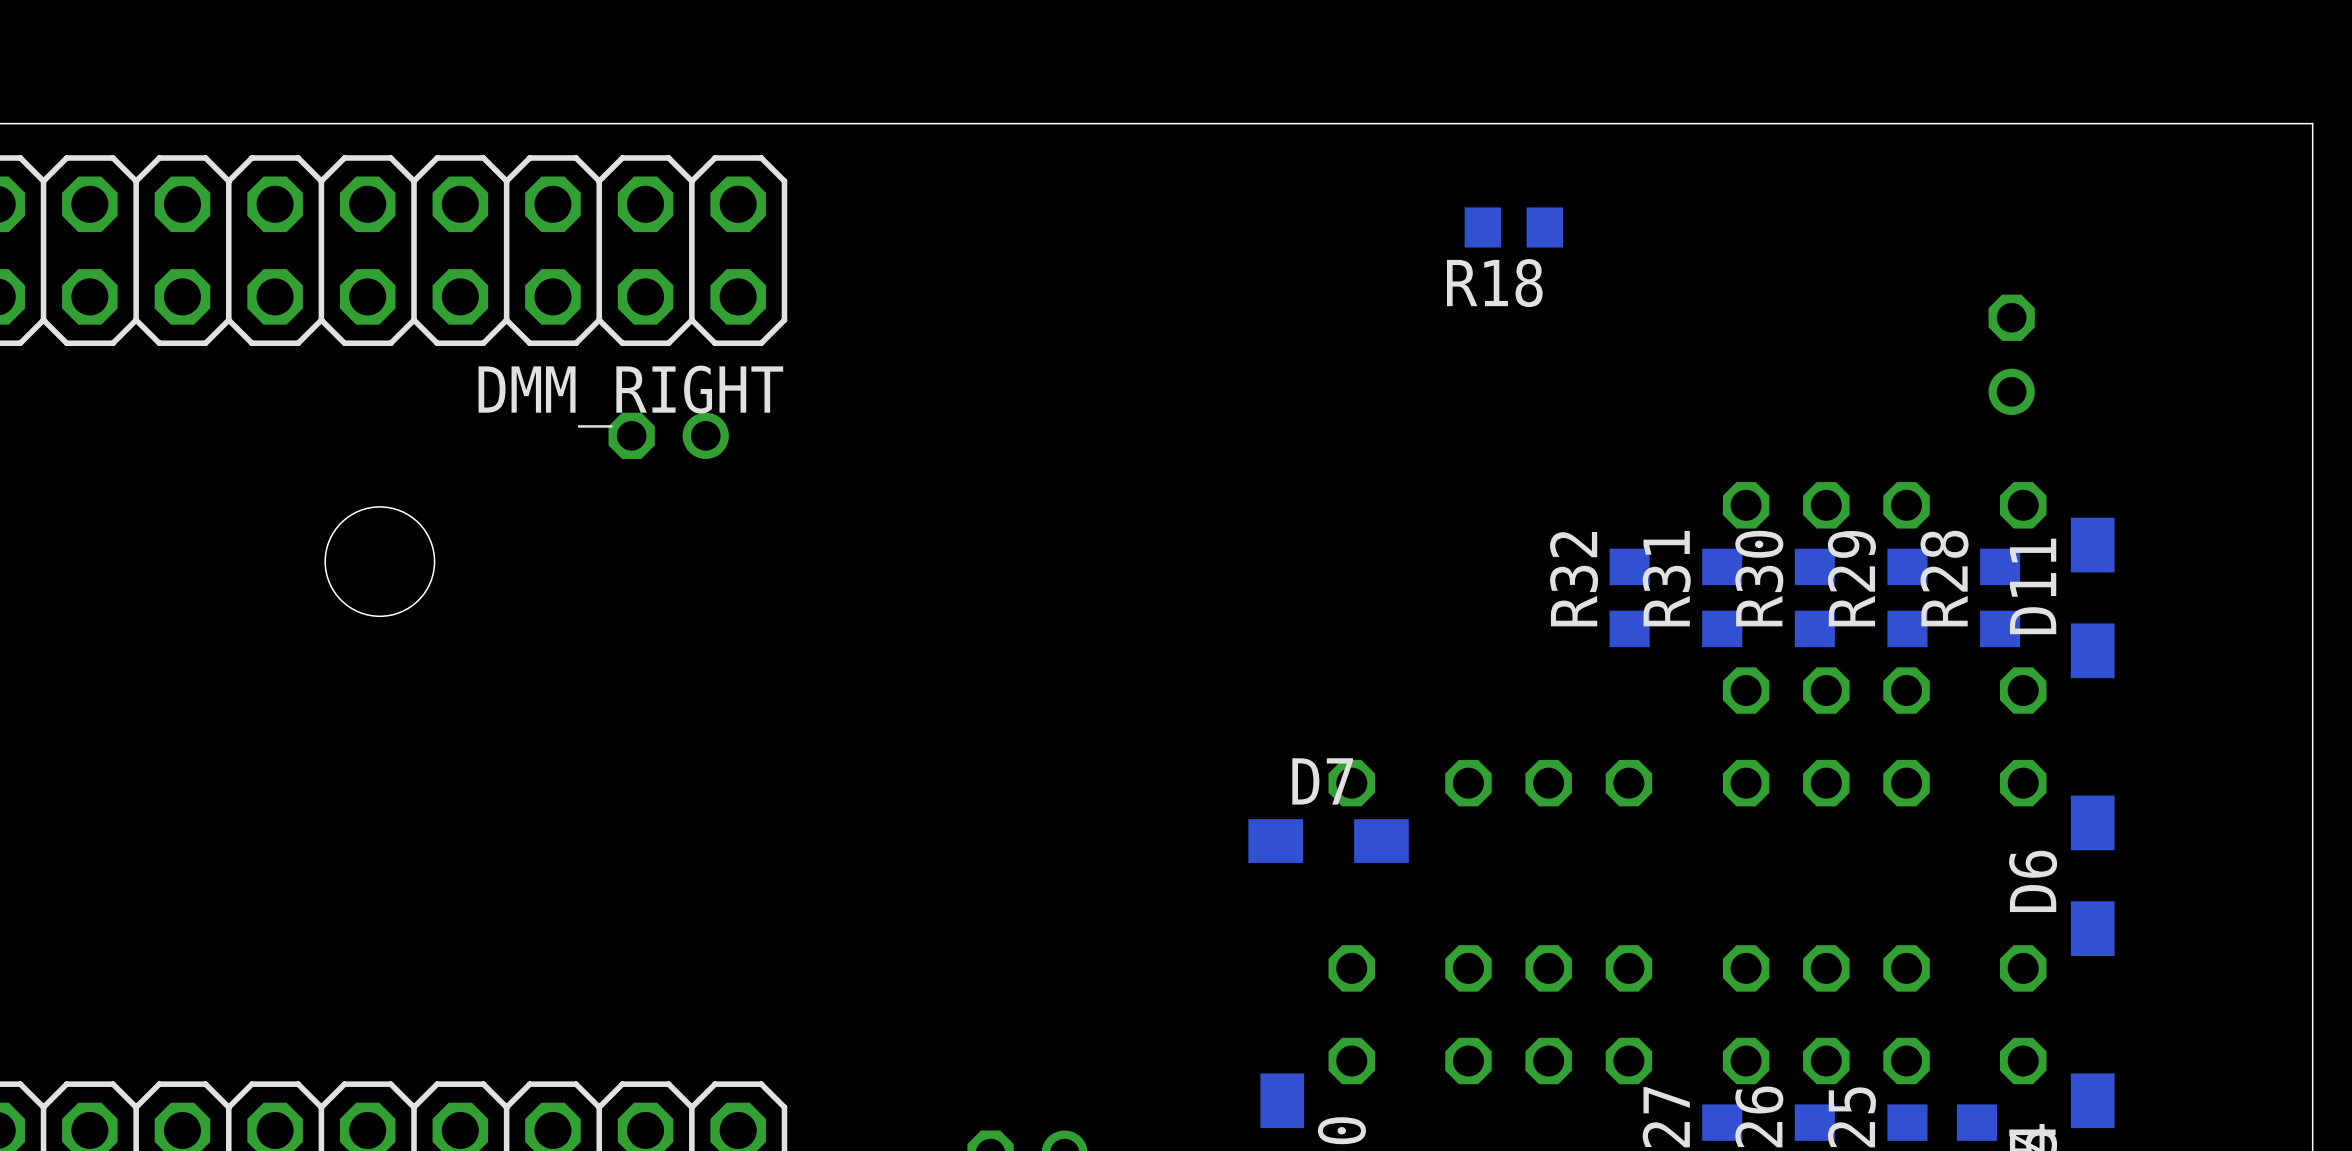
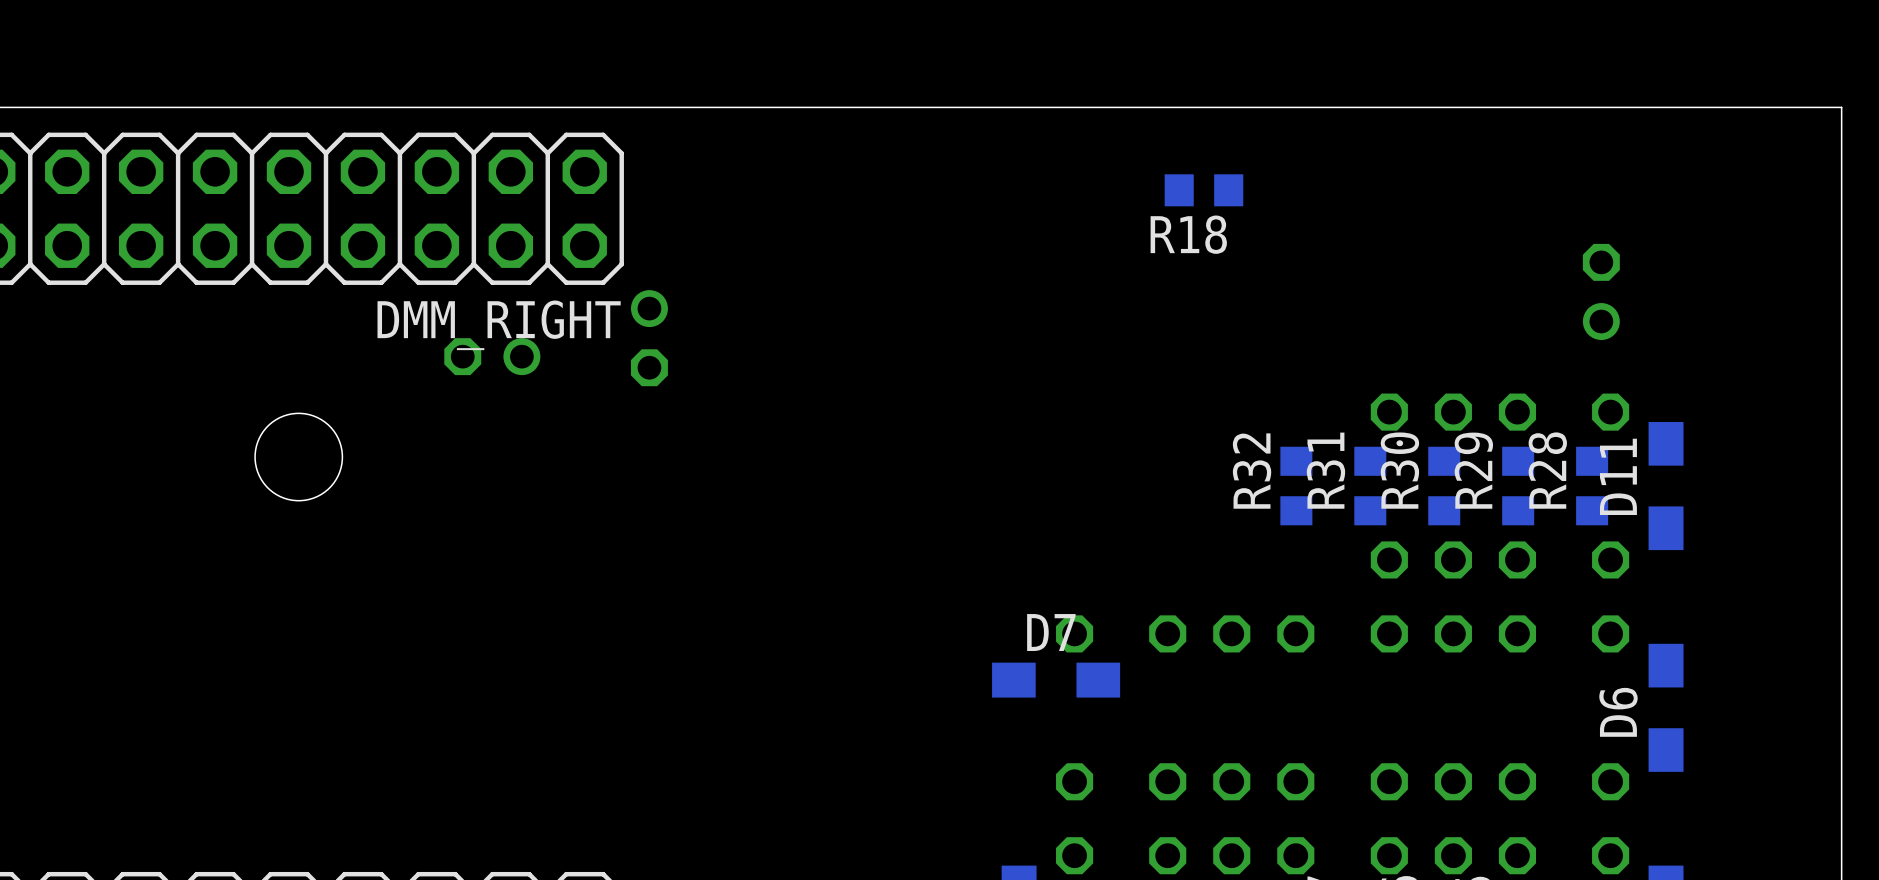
part: none -> (649, 338)
part position: (668, 435) -> (492, 356)

